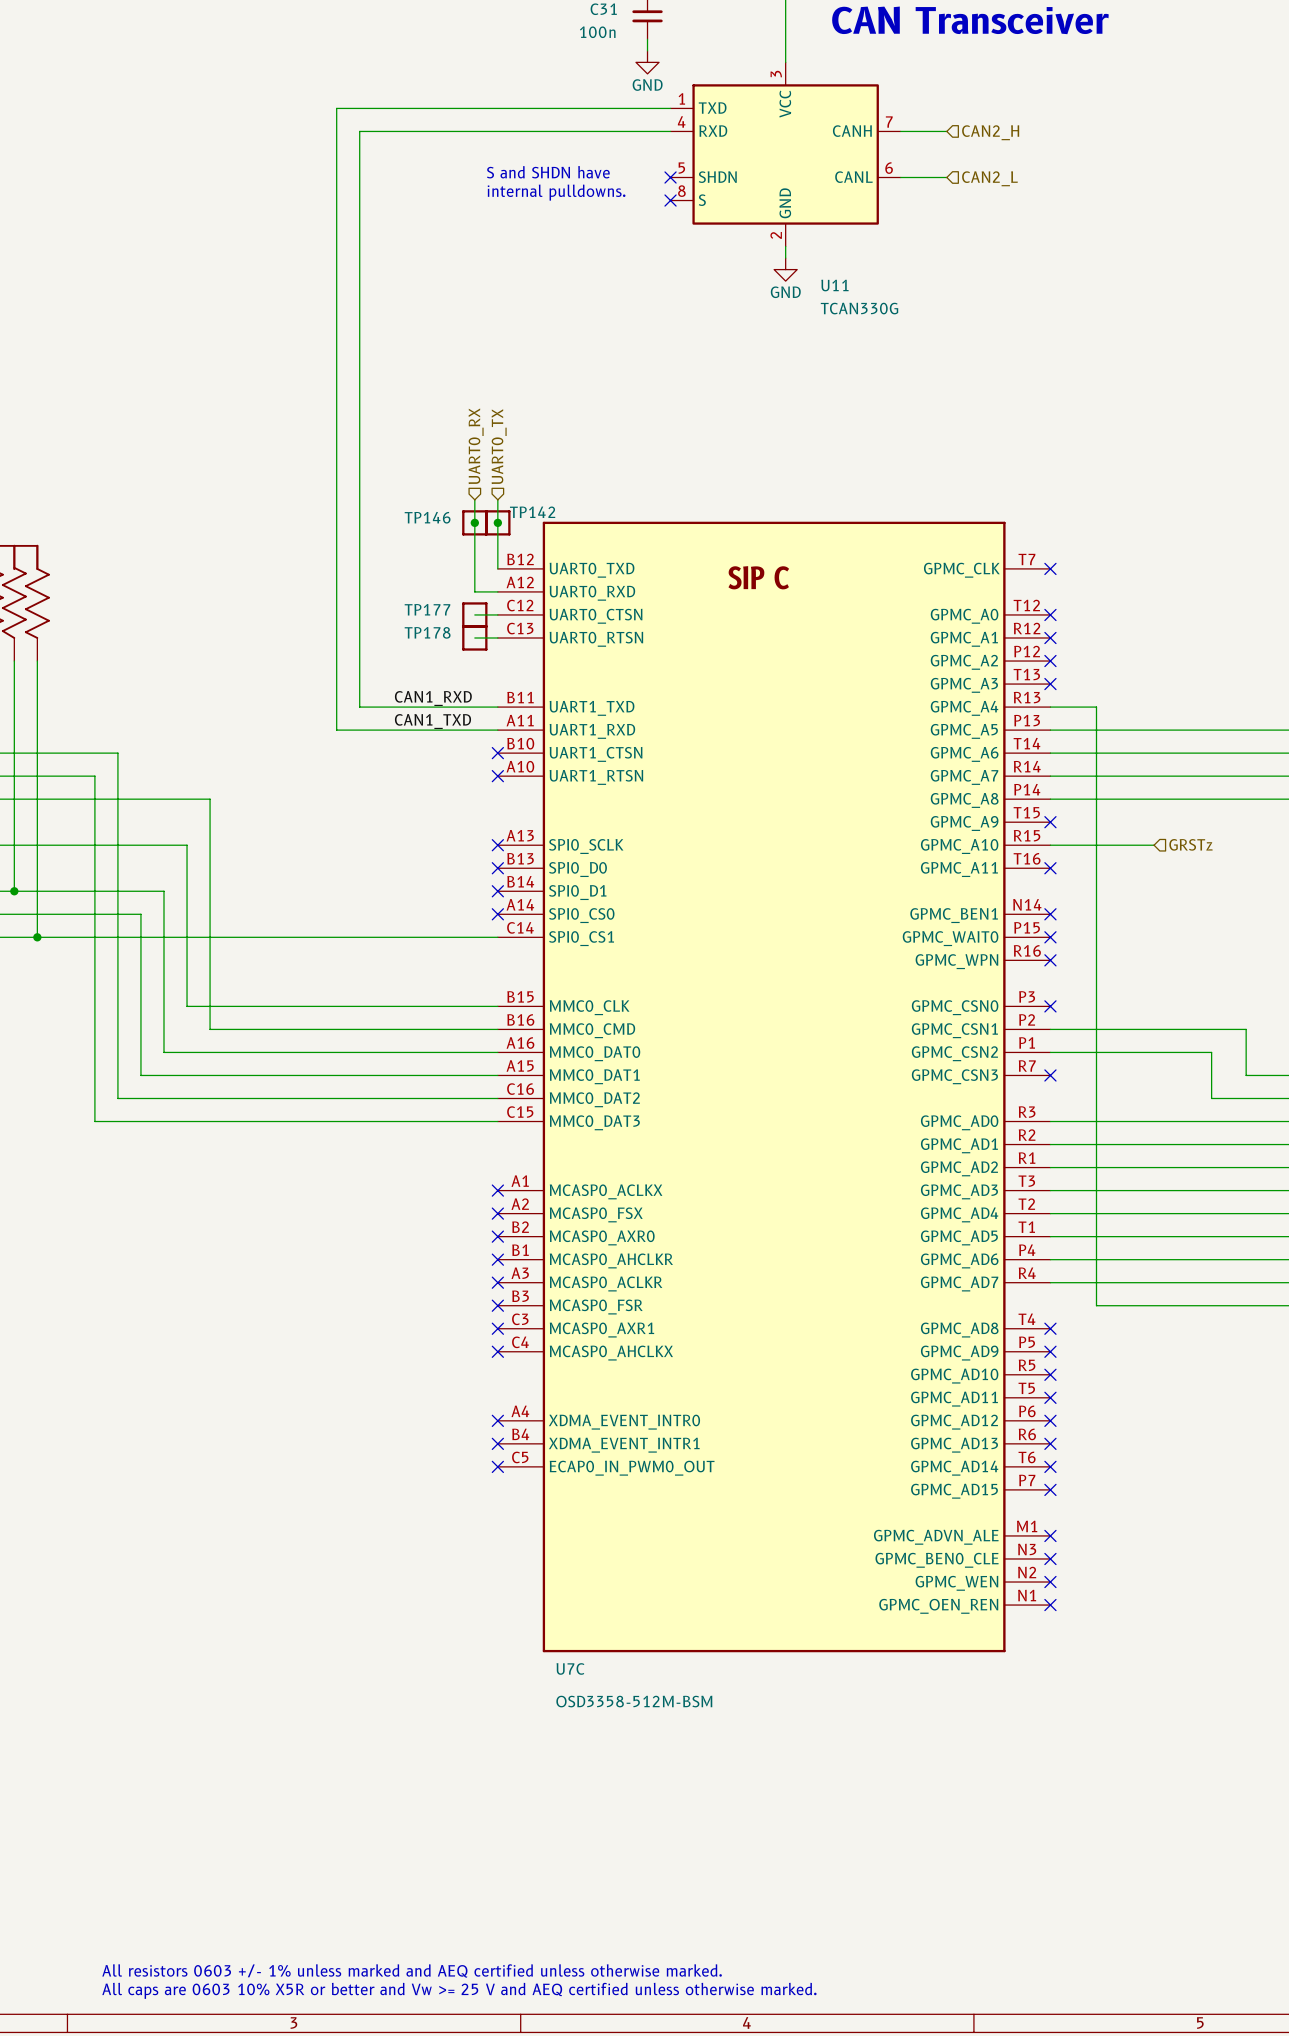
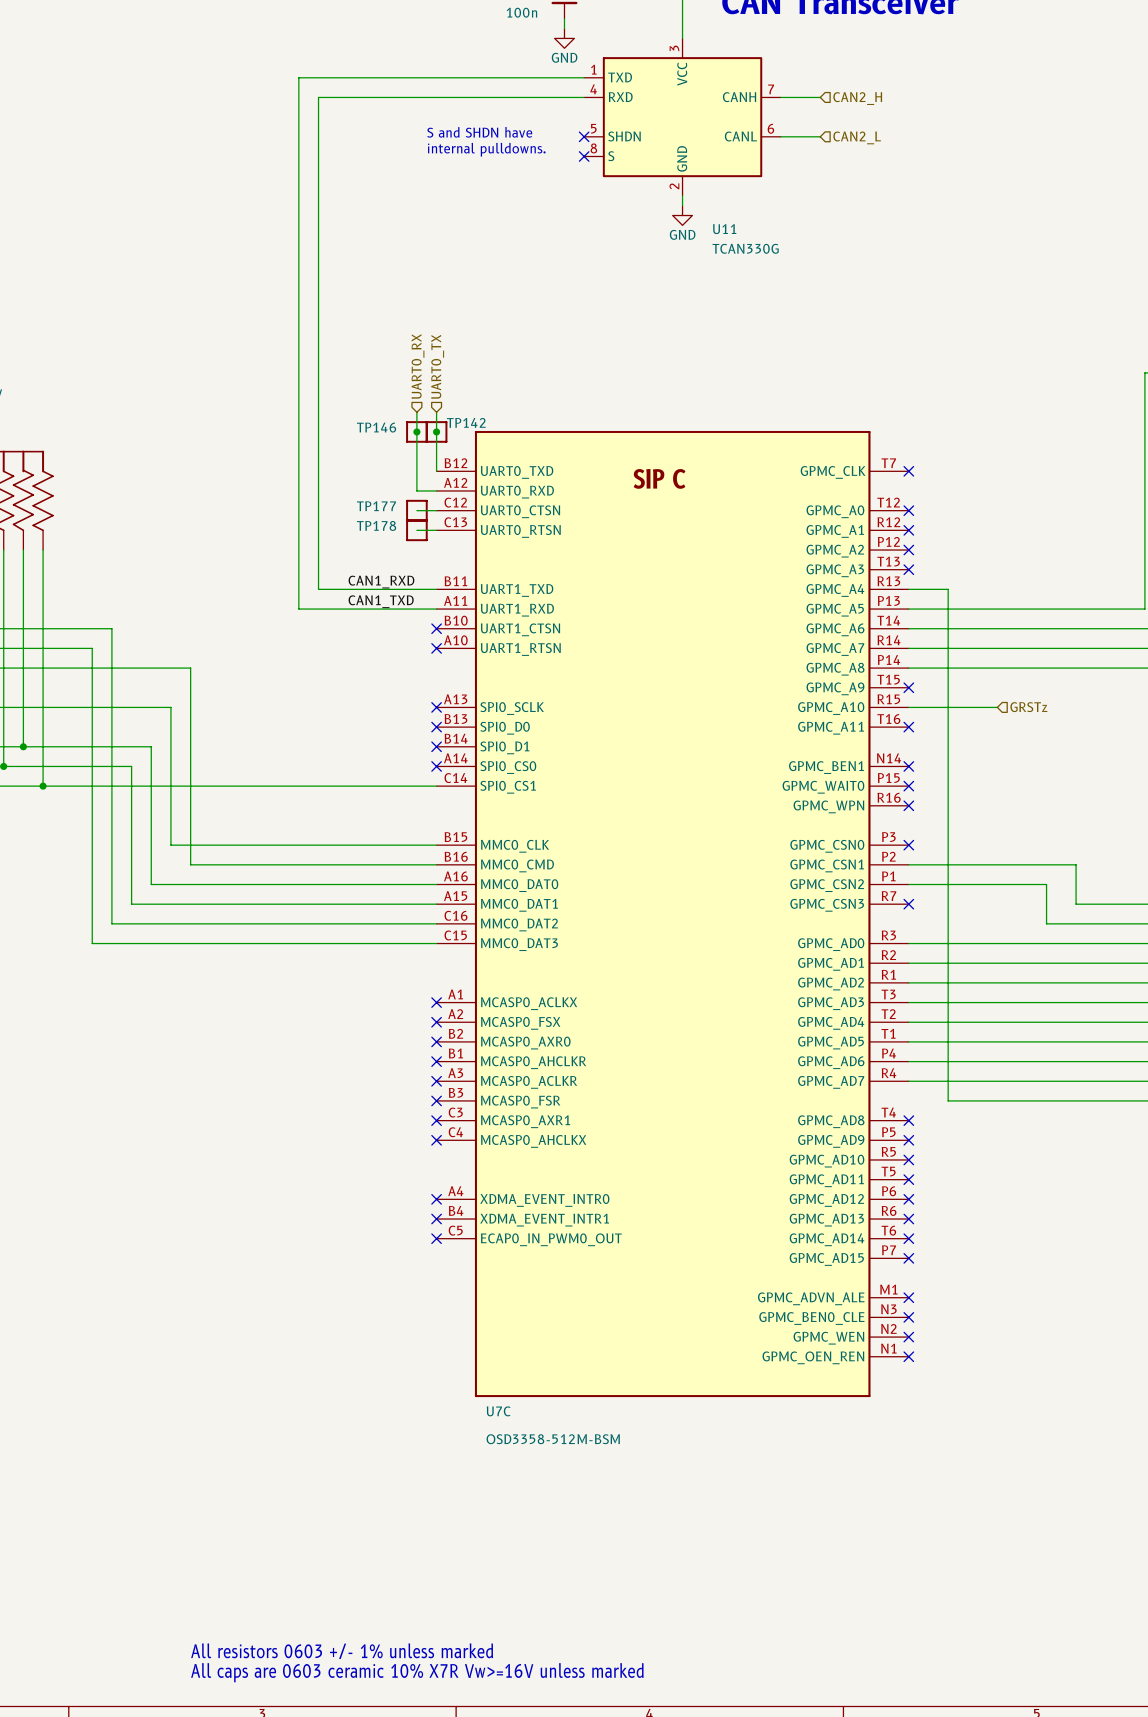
text: All resistors 0603 +/- 1% unless marked and AEQ certified unless otherwise marked. (412, 1970) -> All resistors 0603 +/- 1% unless marked (342, 1651)
text: none -> All caps are 0603 ceramic 10% X7R Vw>=16V unless marked (417, 1672)
text: All caps are 0603 10% X5R or better and Vw >= 25 V and AEQ certified unless otherwise marked. (459, 1990) -> none

